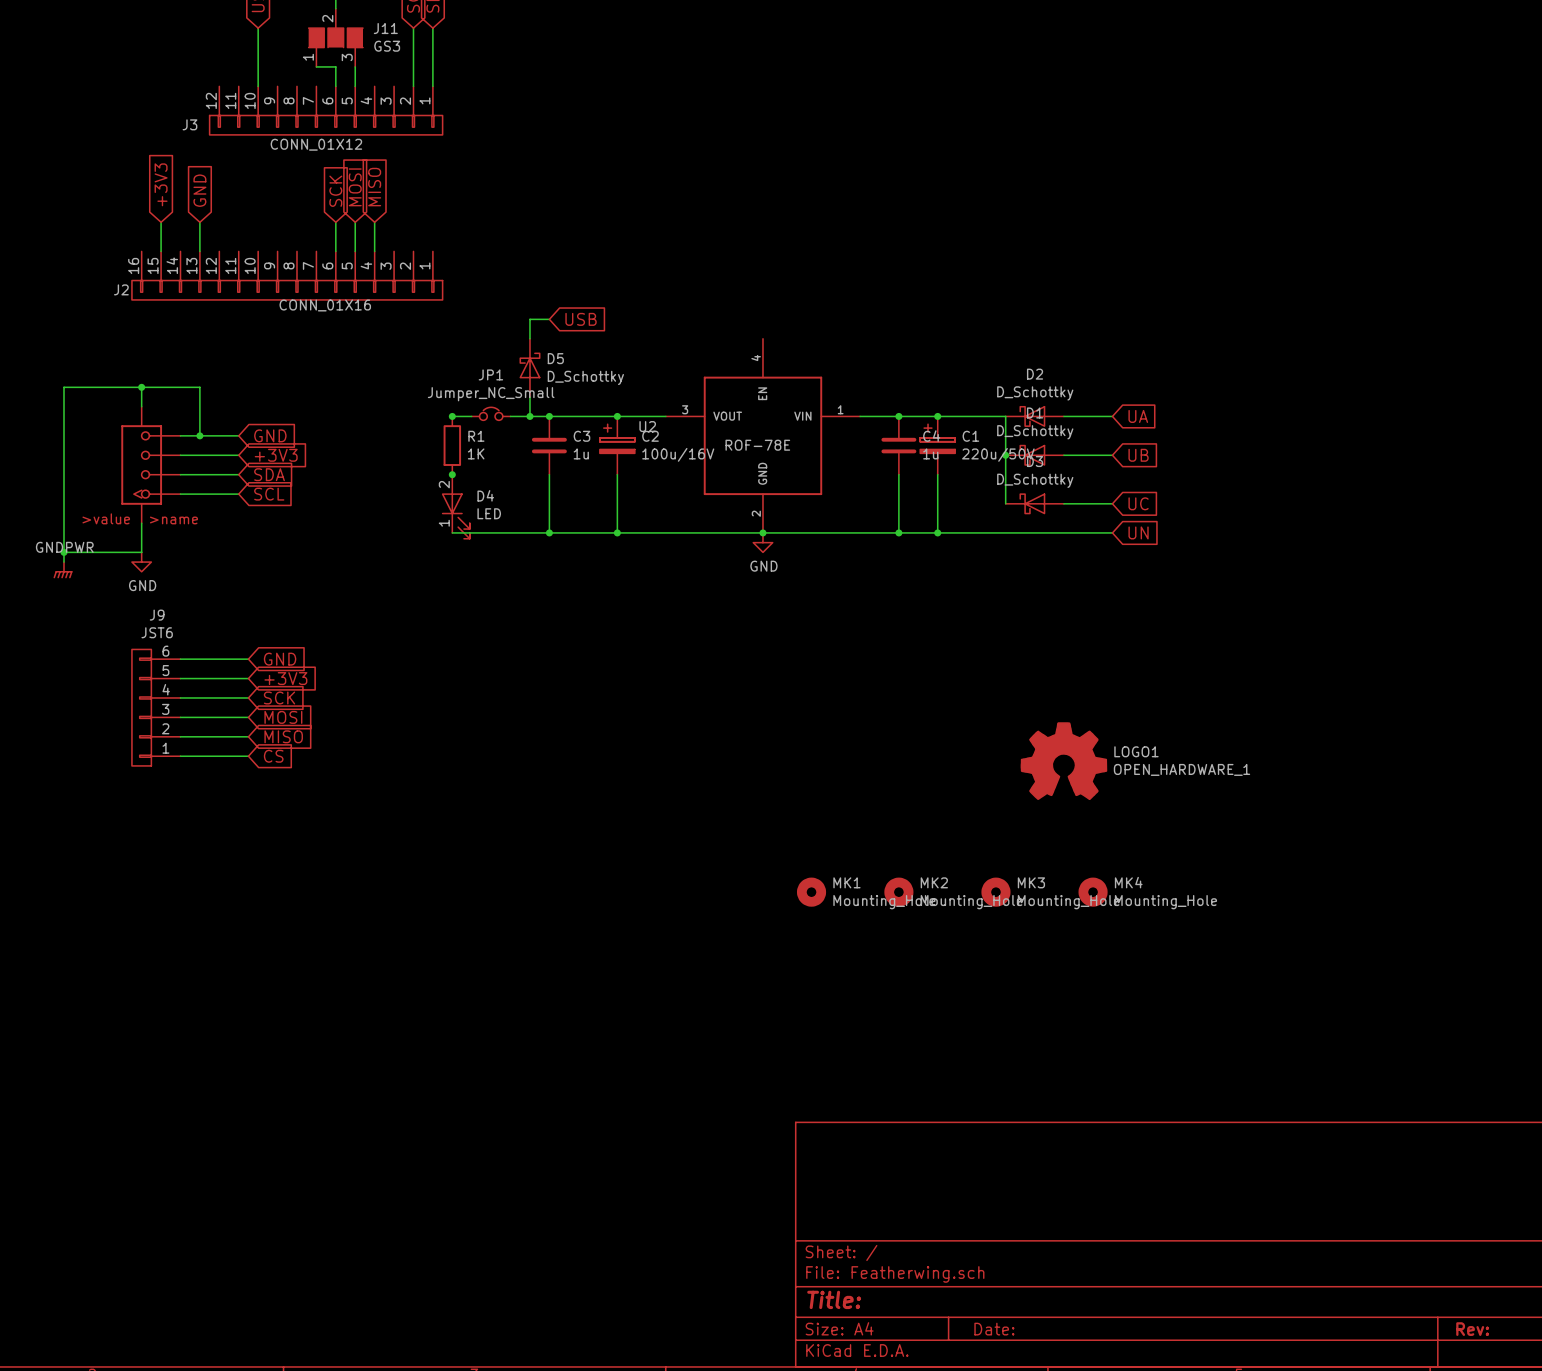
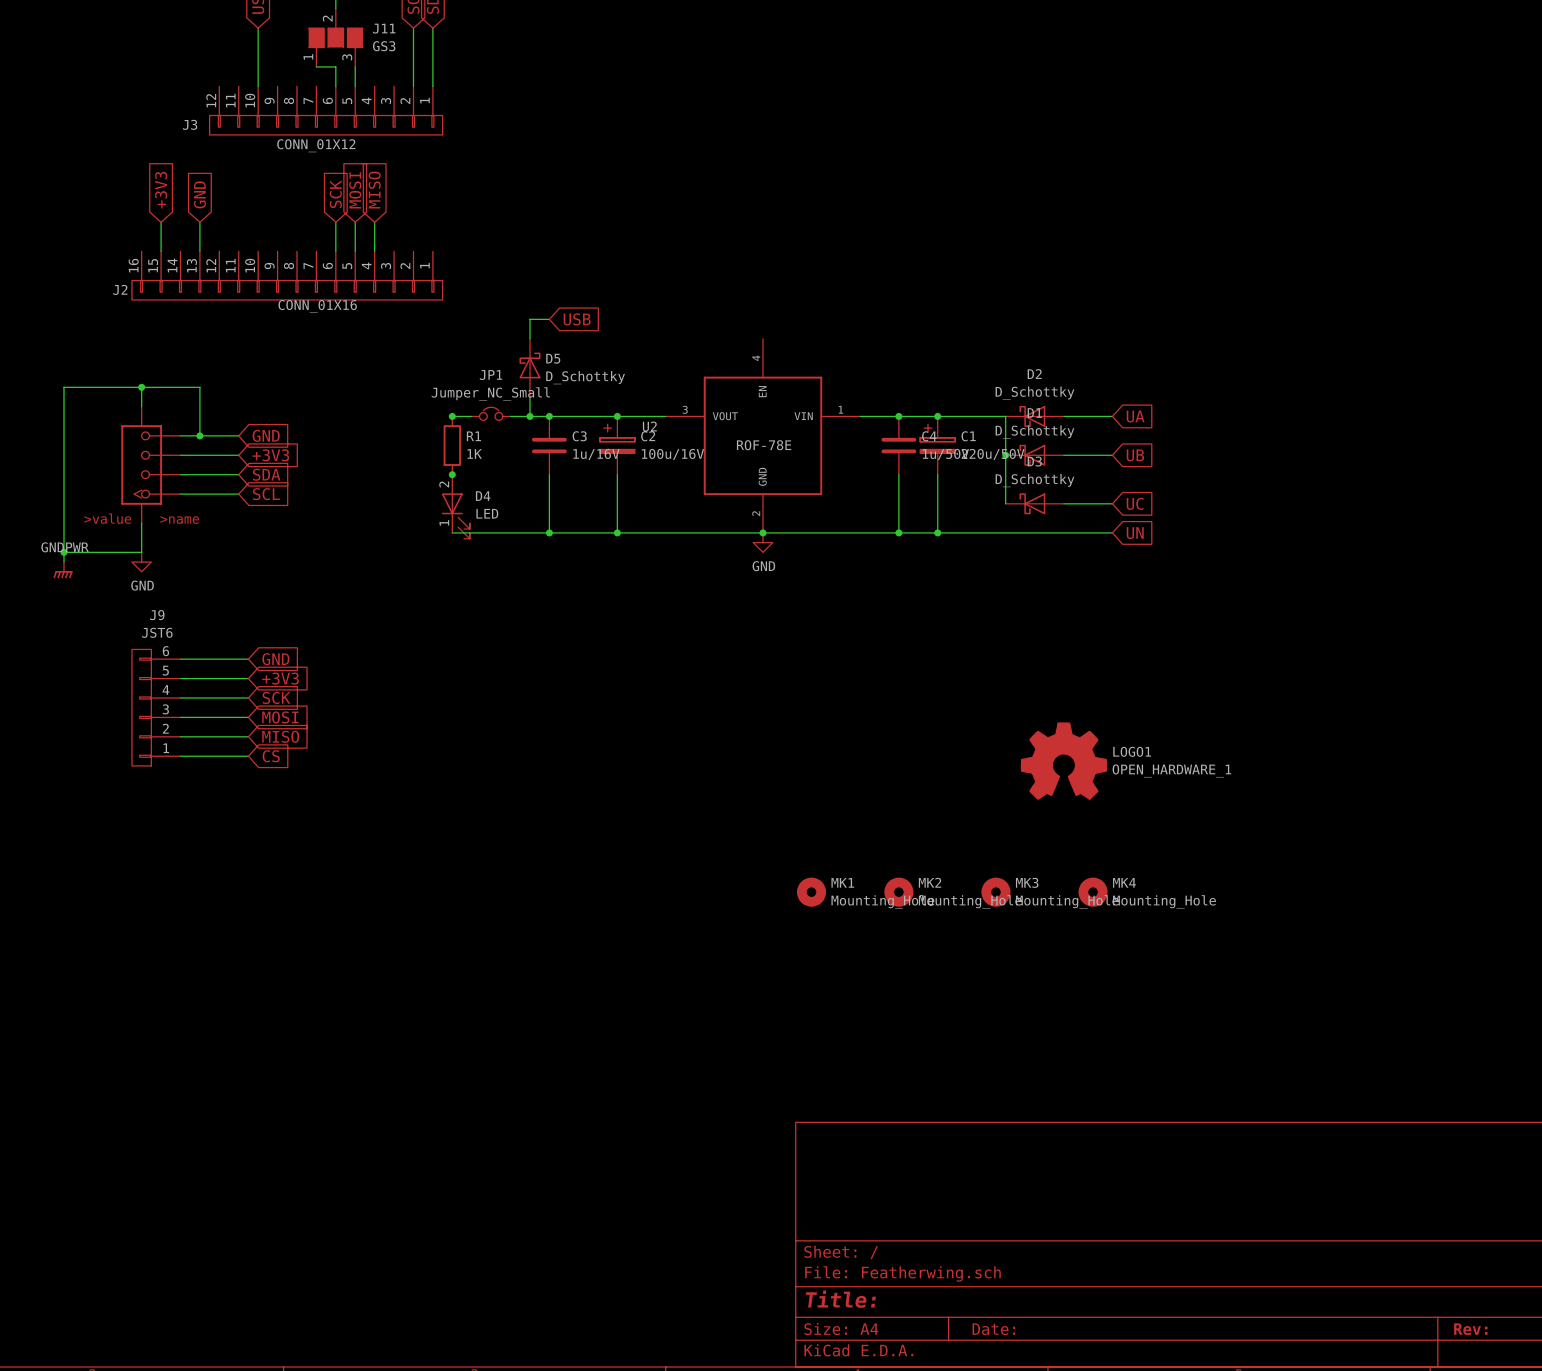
C3 value: 1u (581, 453) -> 1u/16V (596, 454)
C4 value: 1u (930, 453) -> 1u/50V (945, 454)

